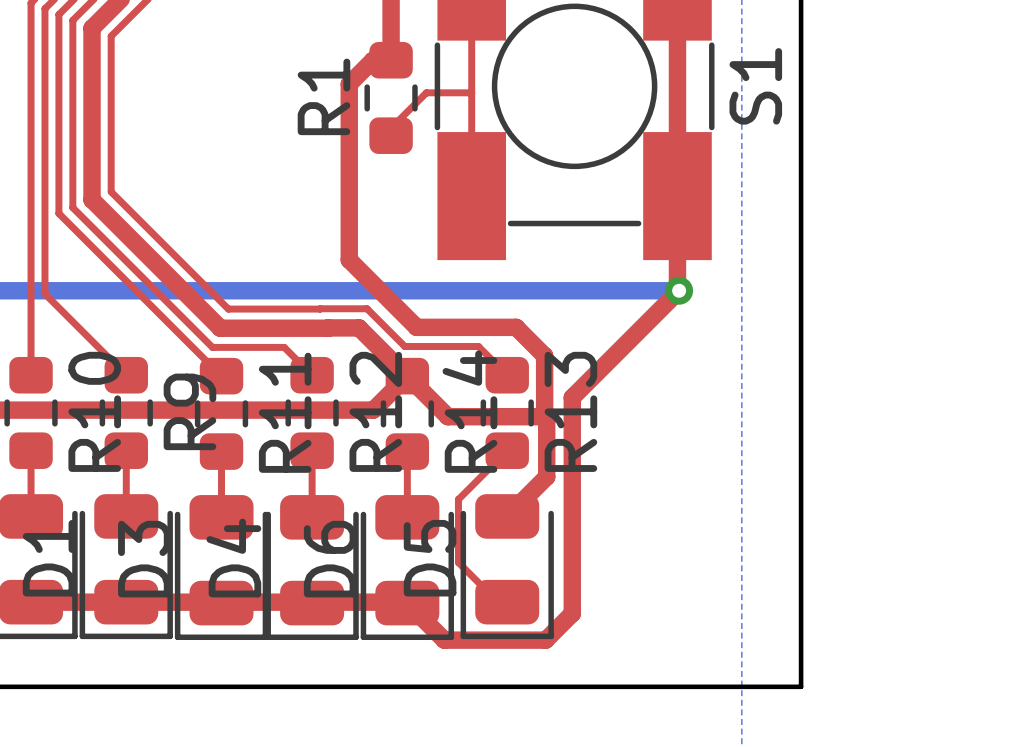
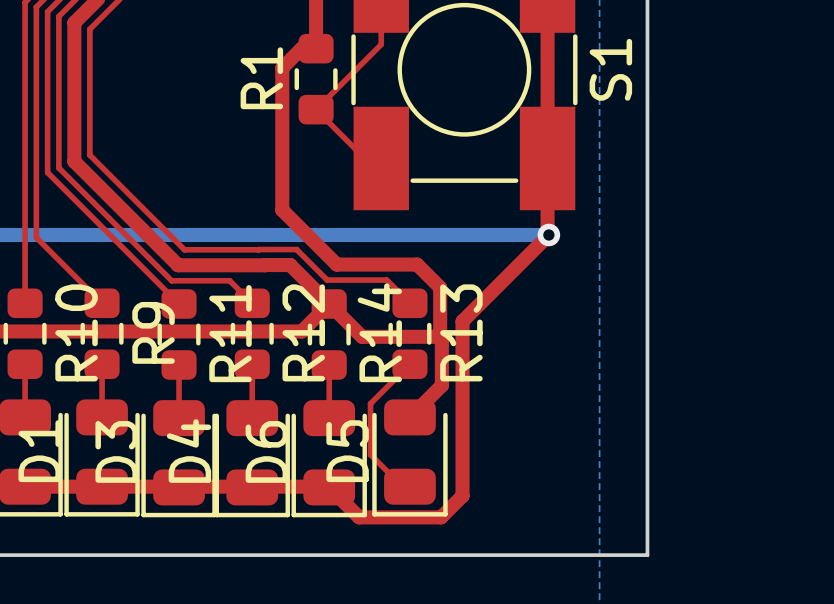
top track: (471, 55) (471, 196) -> (381, 44) (316, 109) (364, 158)
top track: (471, 92) (426, 92) (391, 128) -> none

